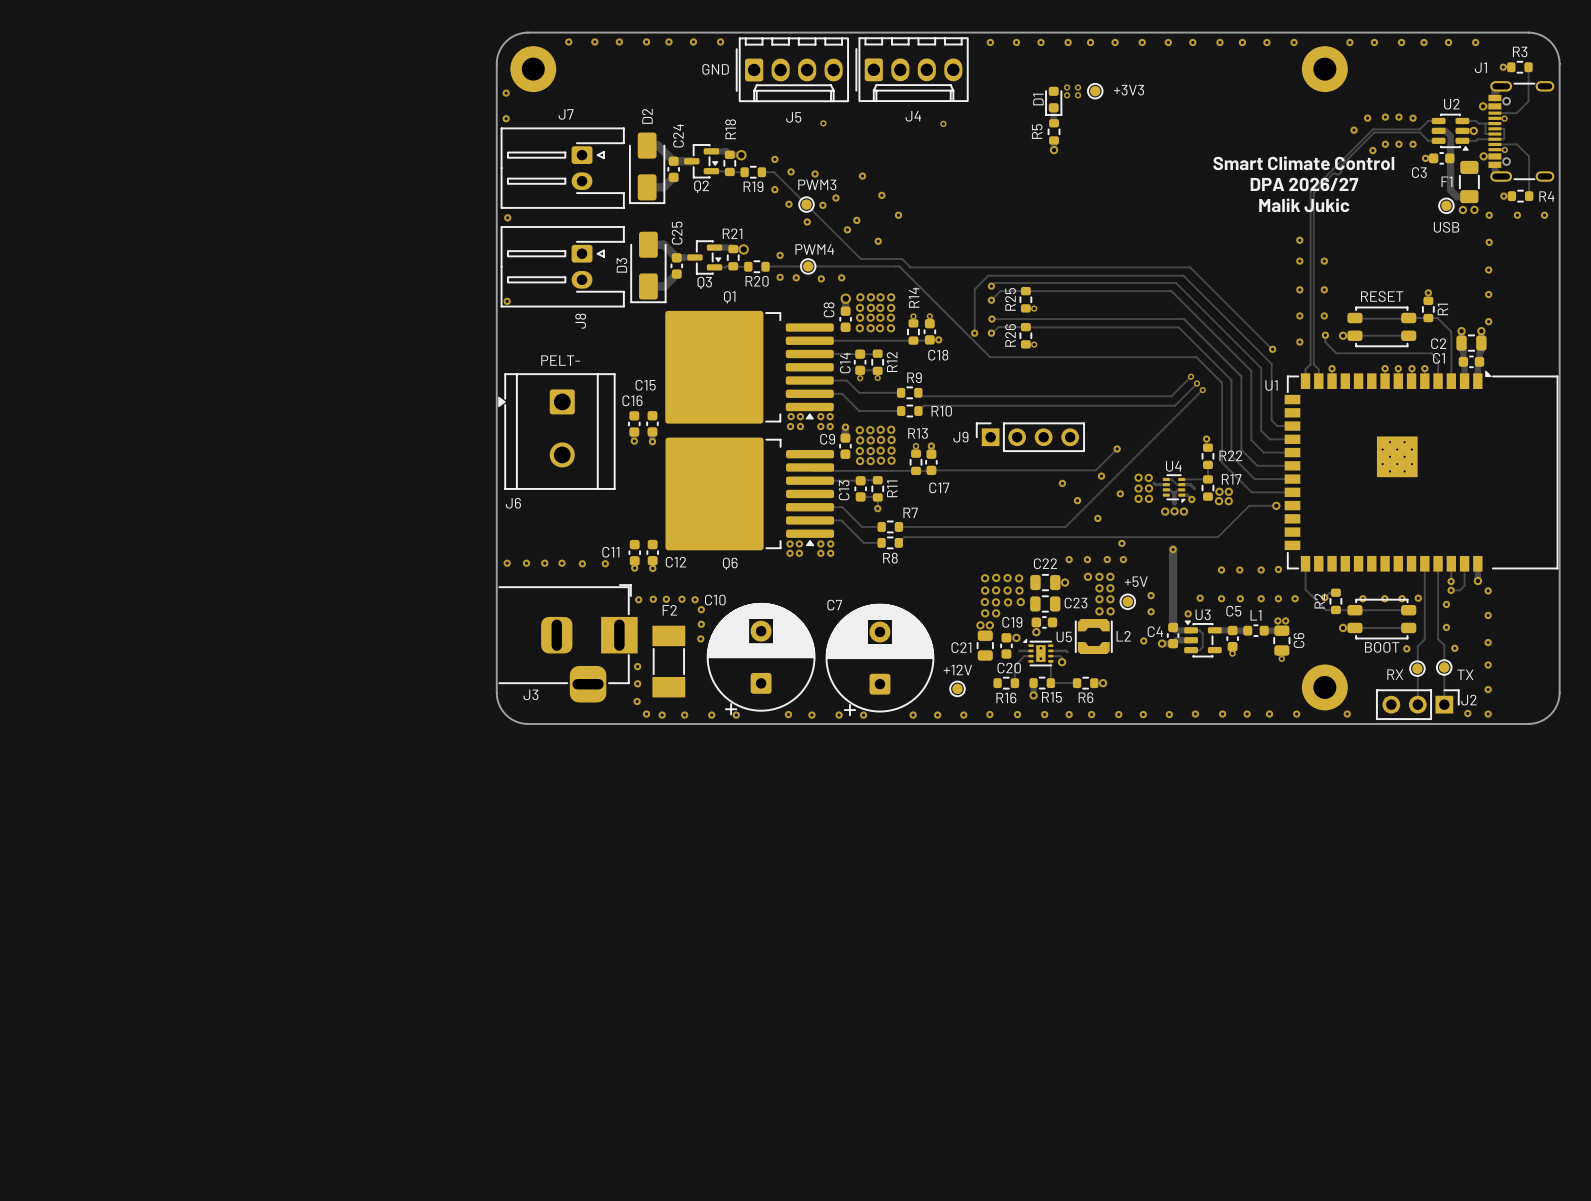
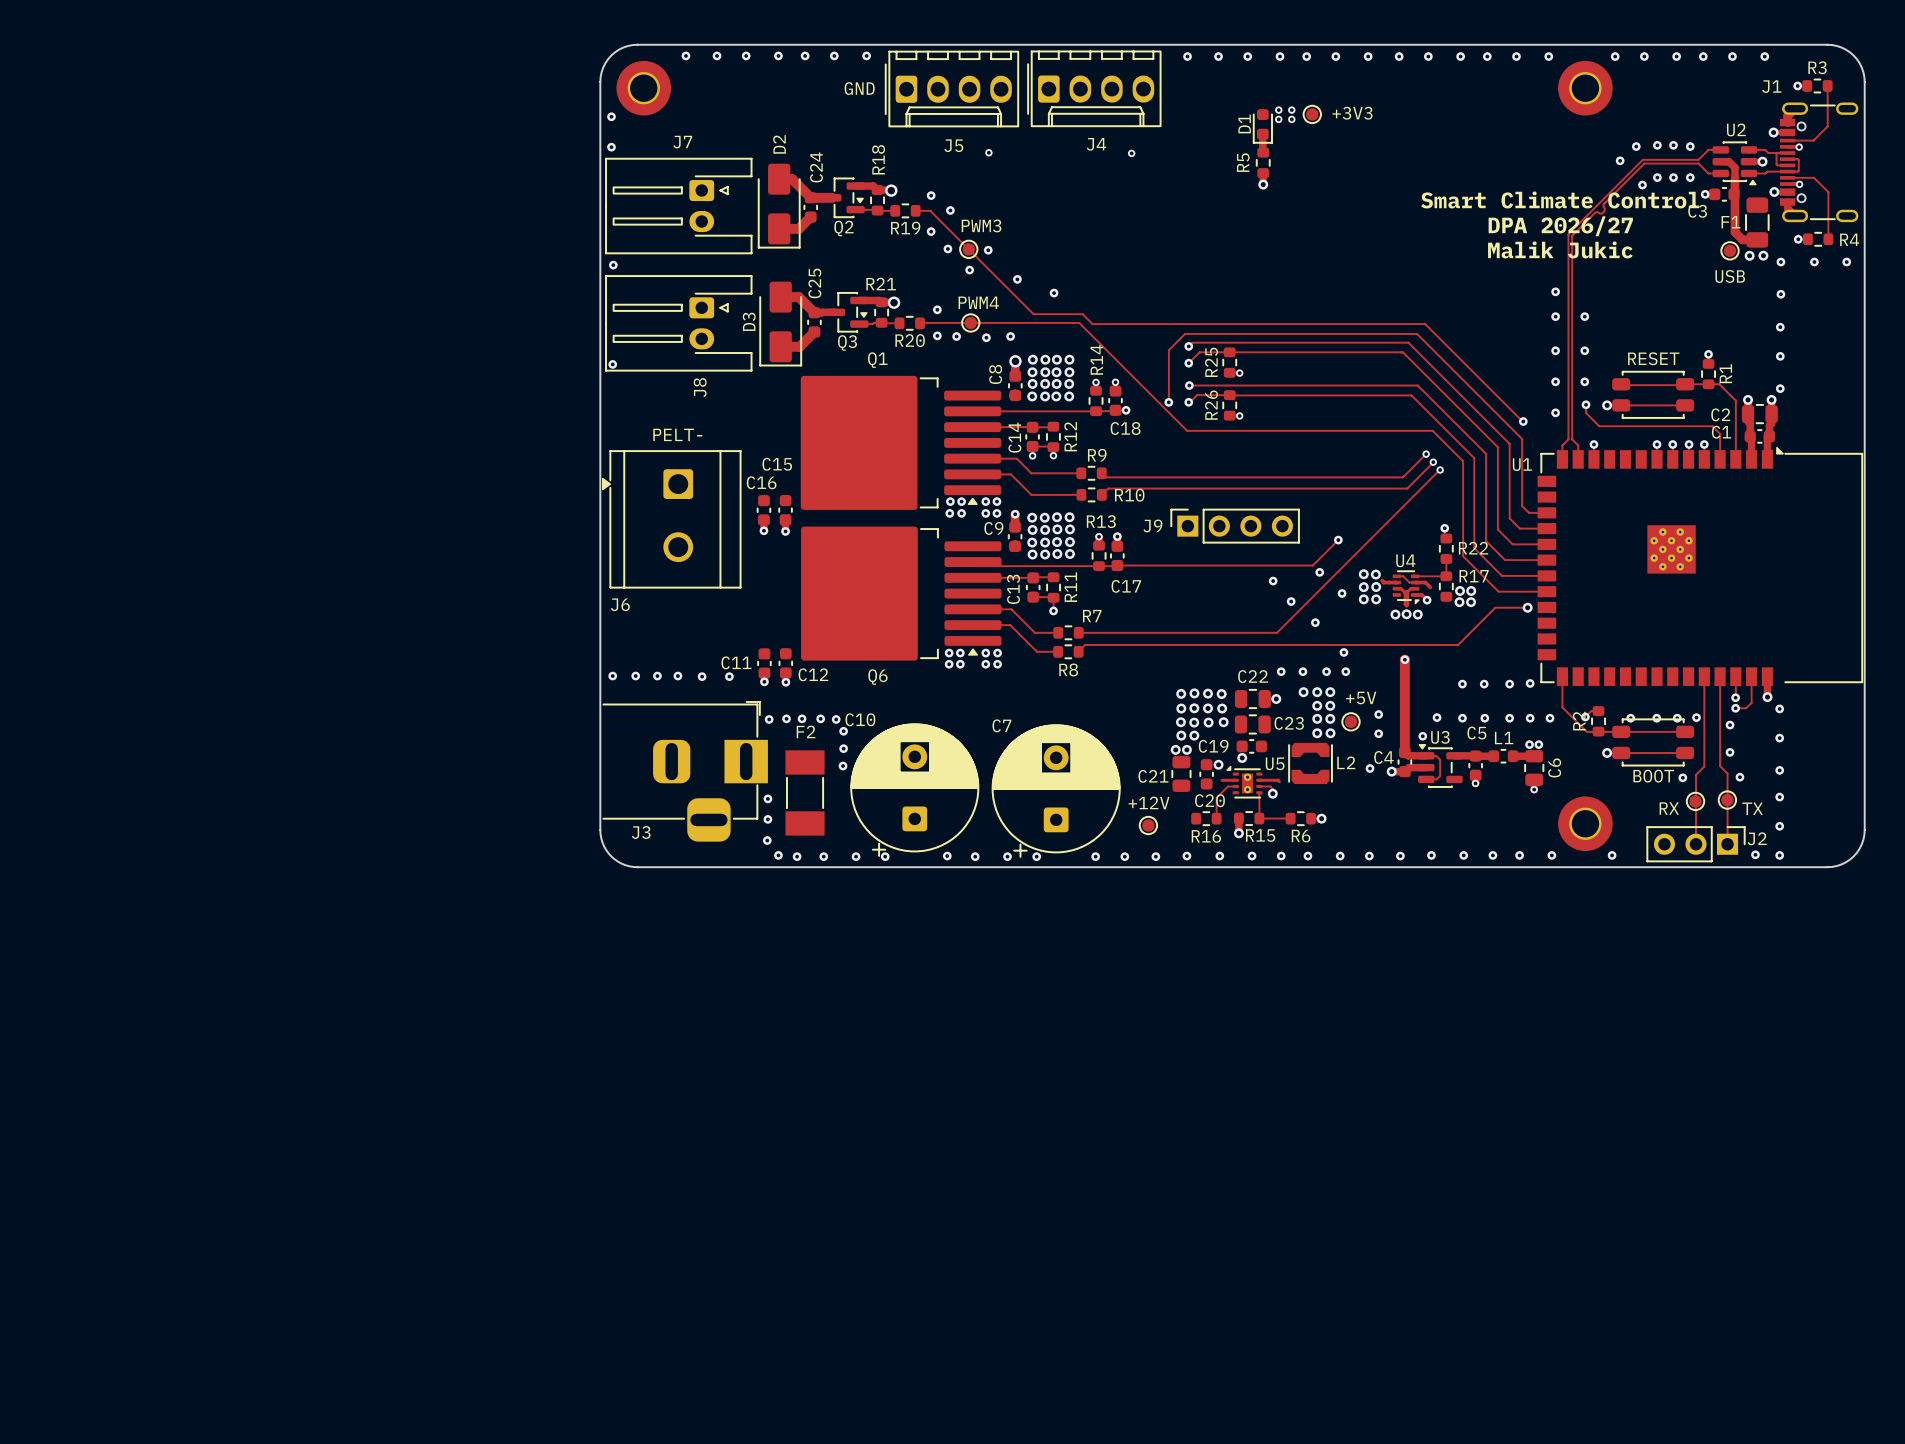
via: (815, 174) -> none
via: (862, 176) -> none
via: (881, 195) -> none
via: (835, 198) -> none
via: (898, 215) -> none
via: (856, 220) -> none

